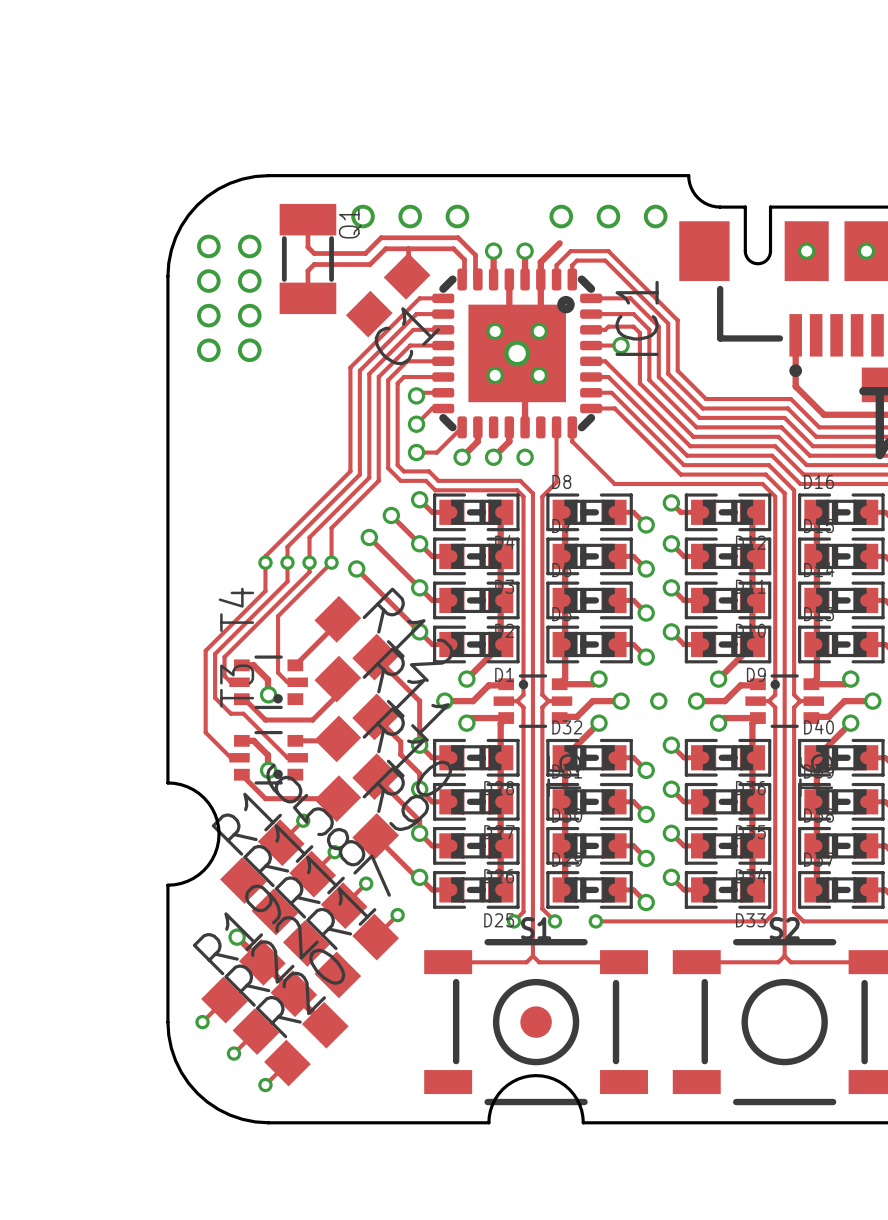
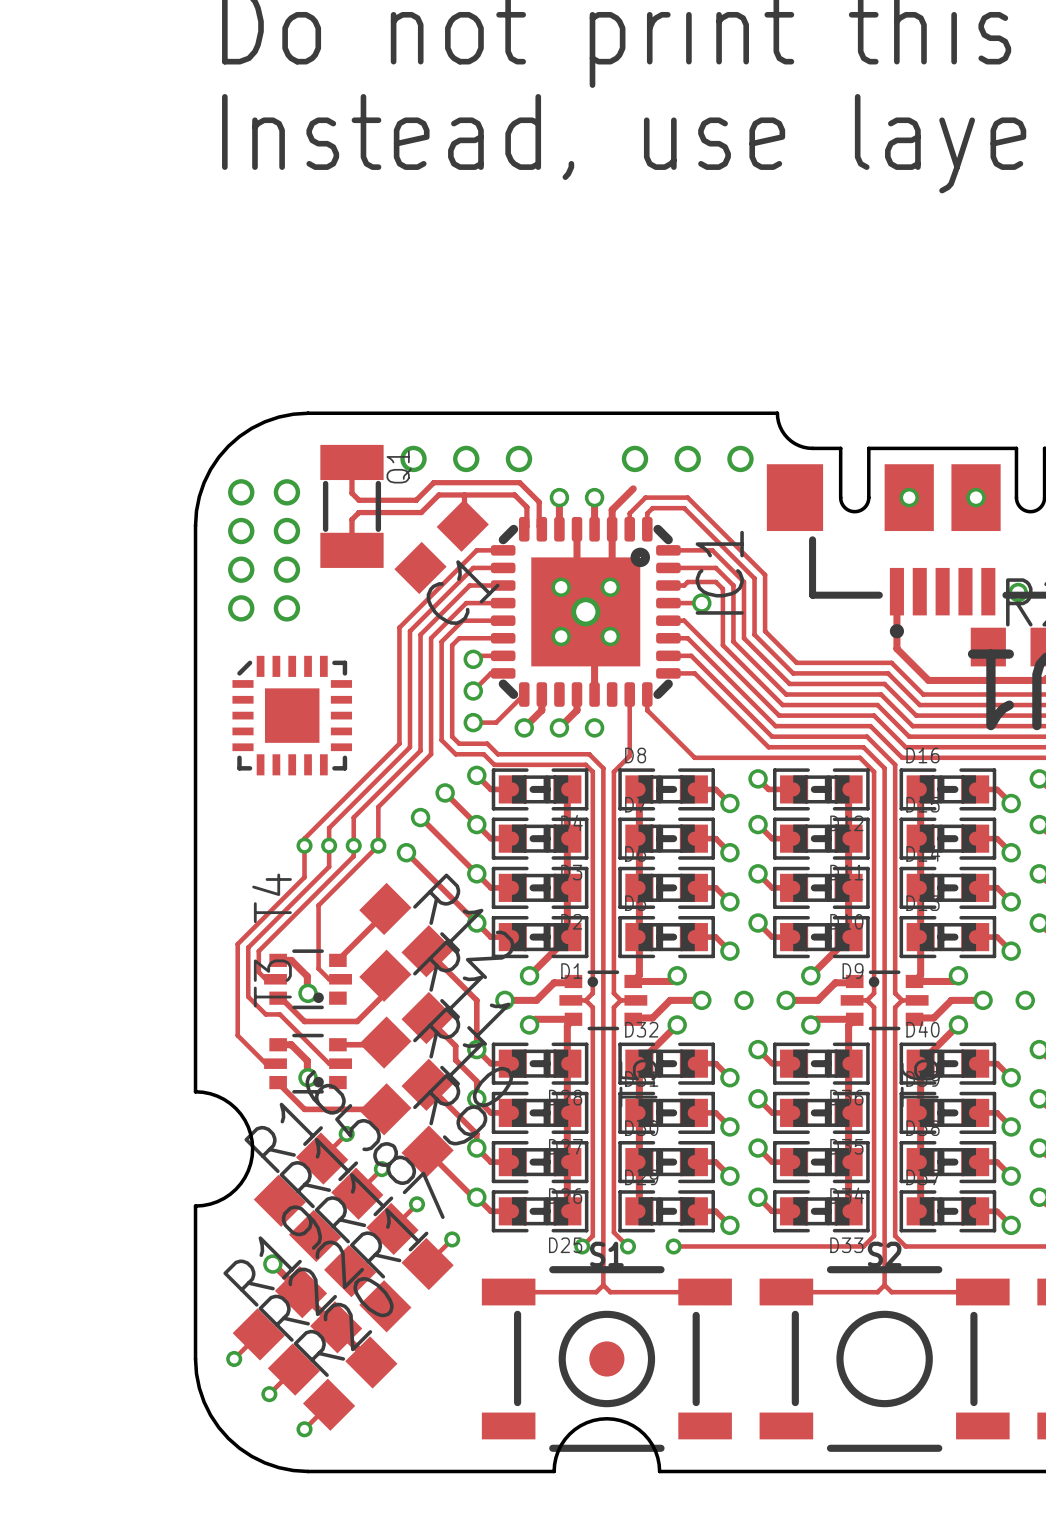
part: none -> (292, 715)

